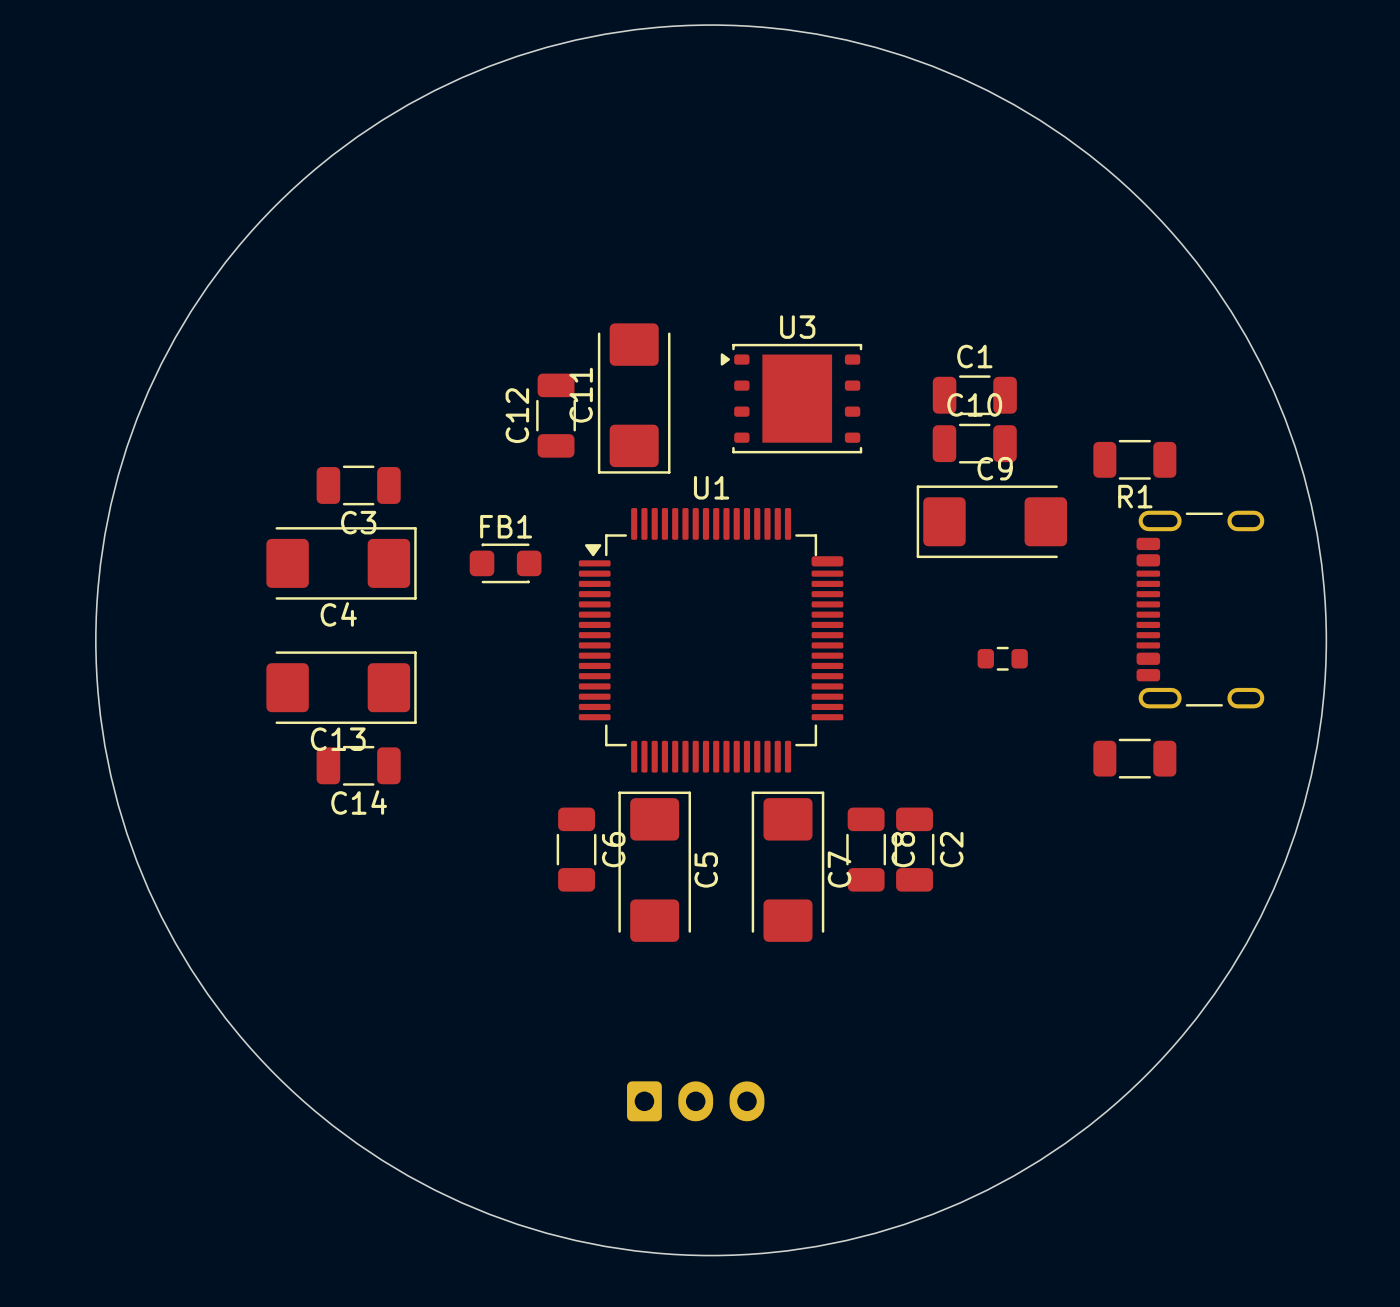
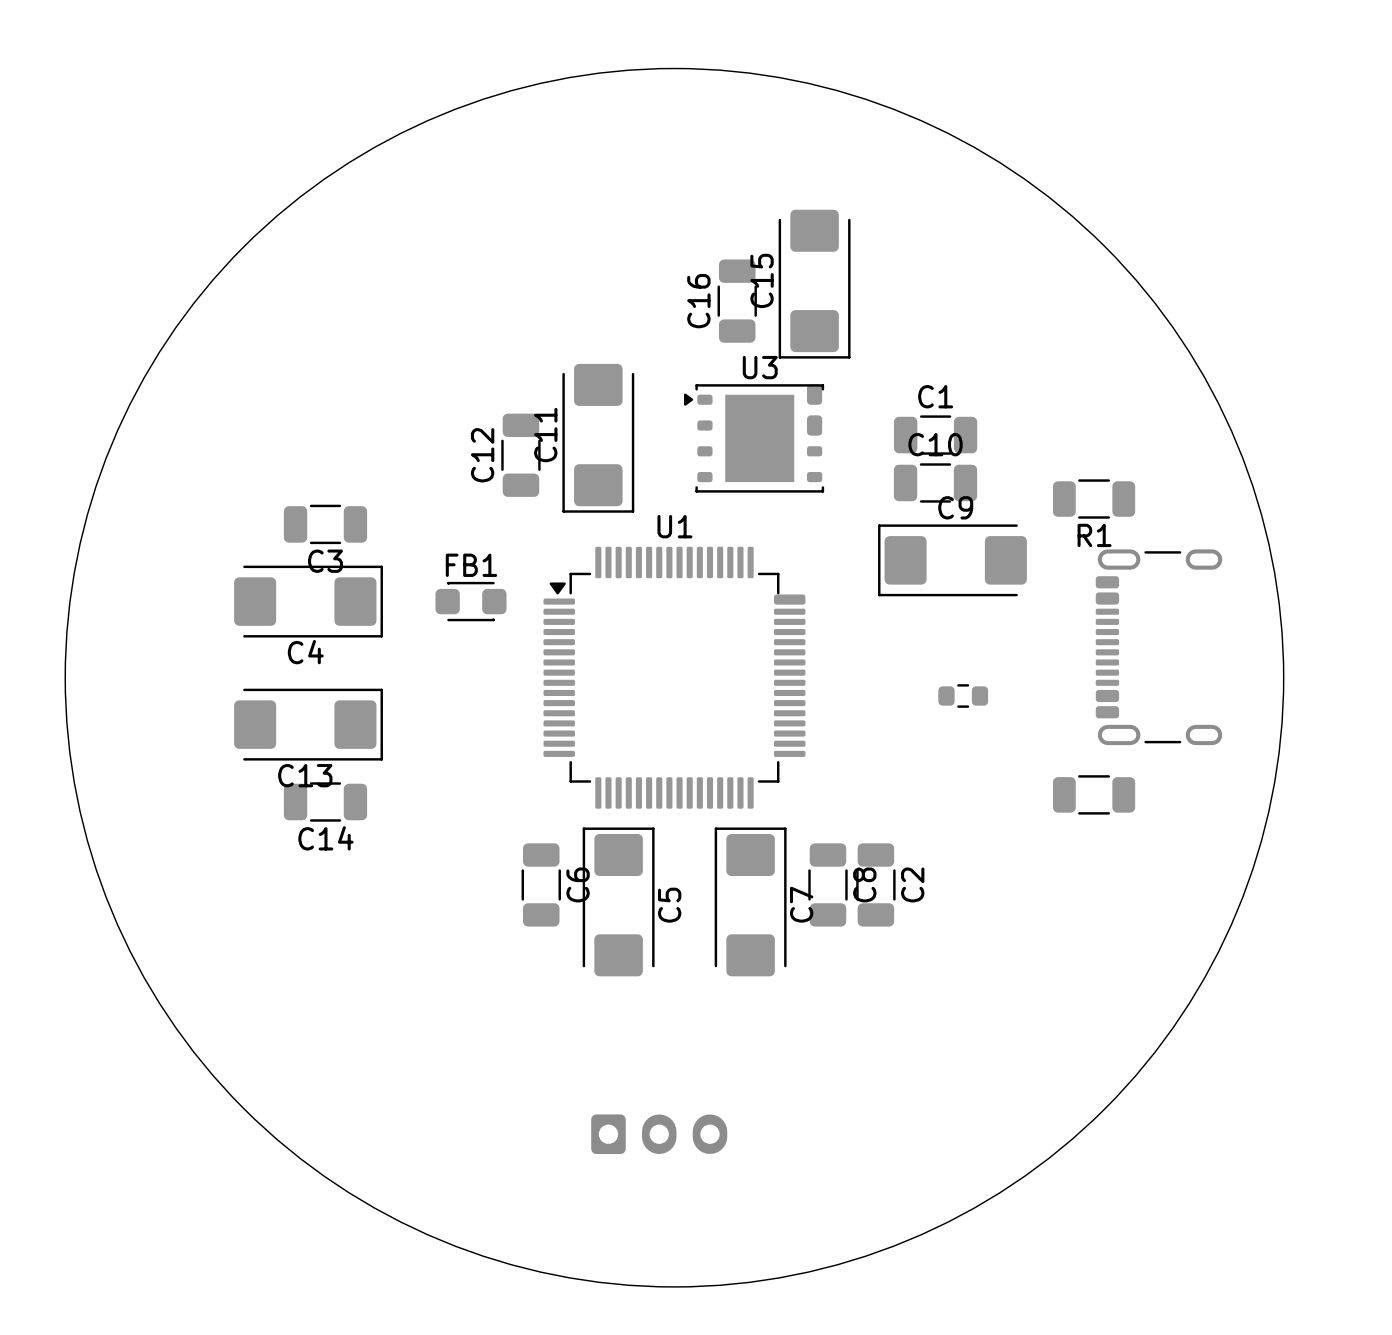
C15: none -> (814, 284)
C16: none -> (737, 301)
U3 footprint: [720, 343, 863, 454] -> [684, 384, 825, 493]

